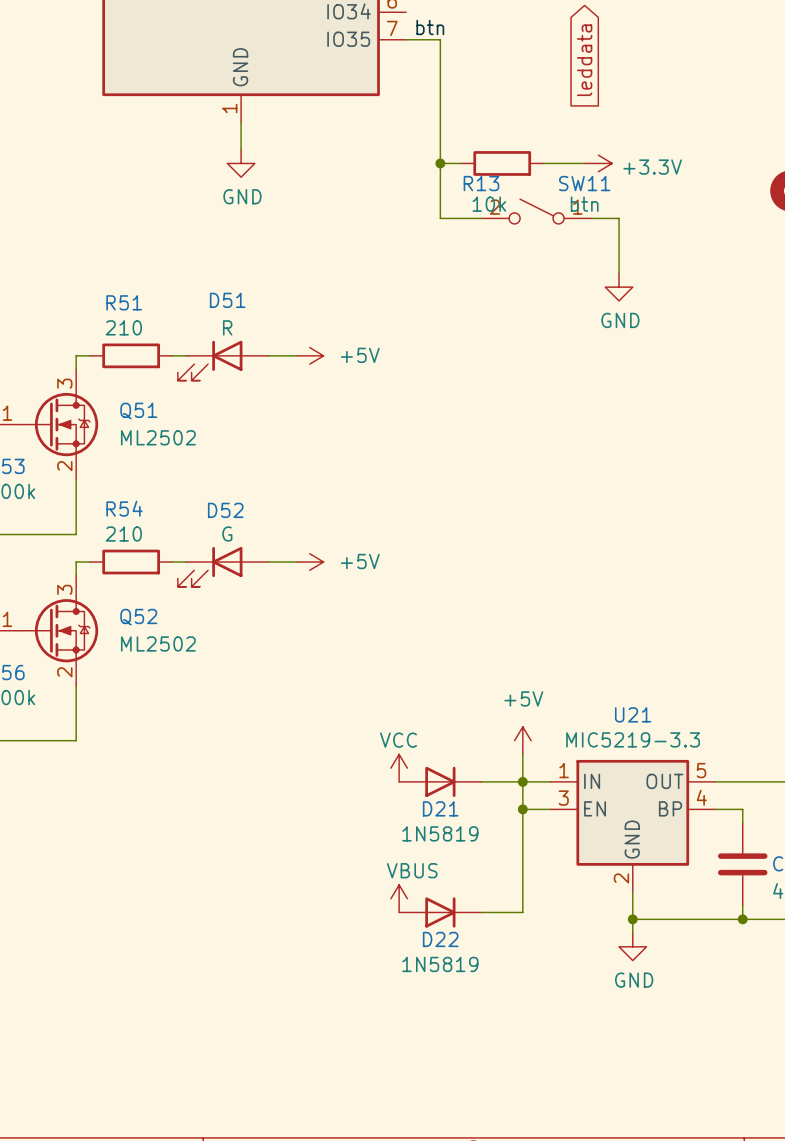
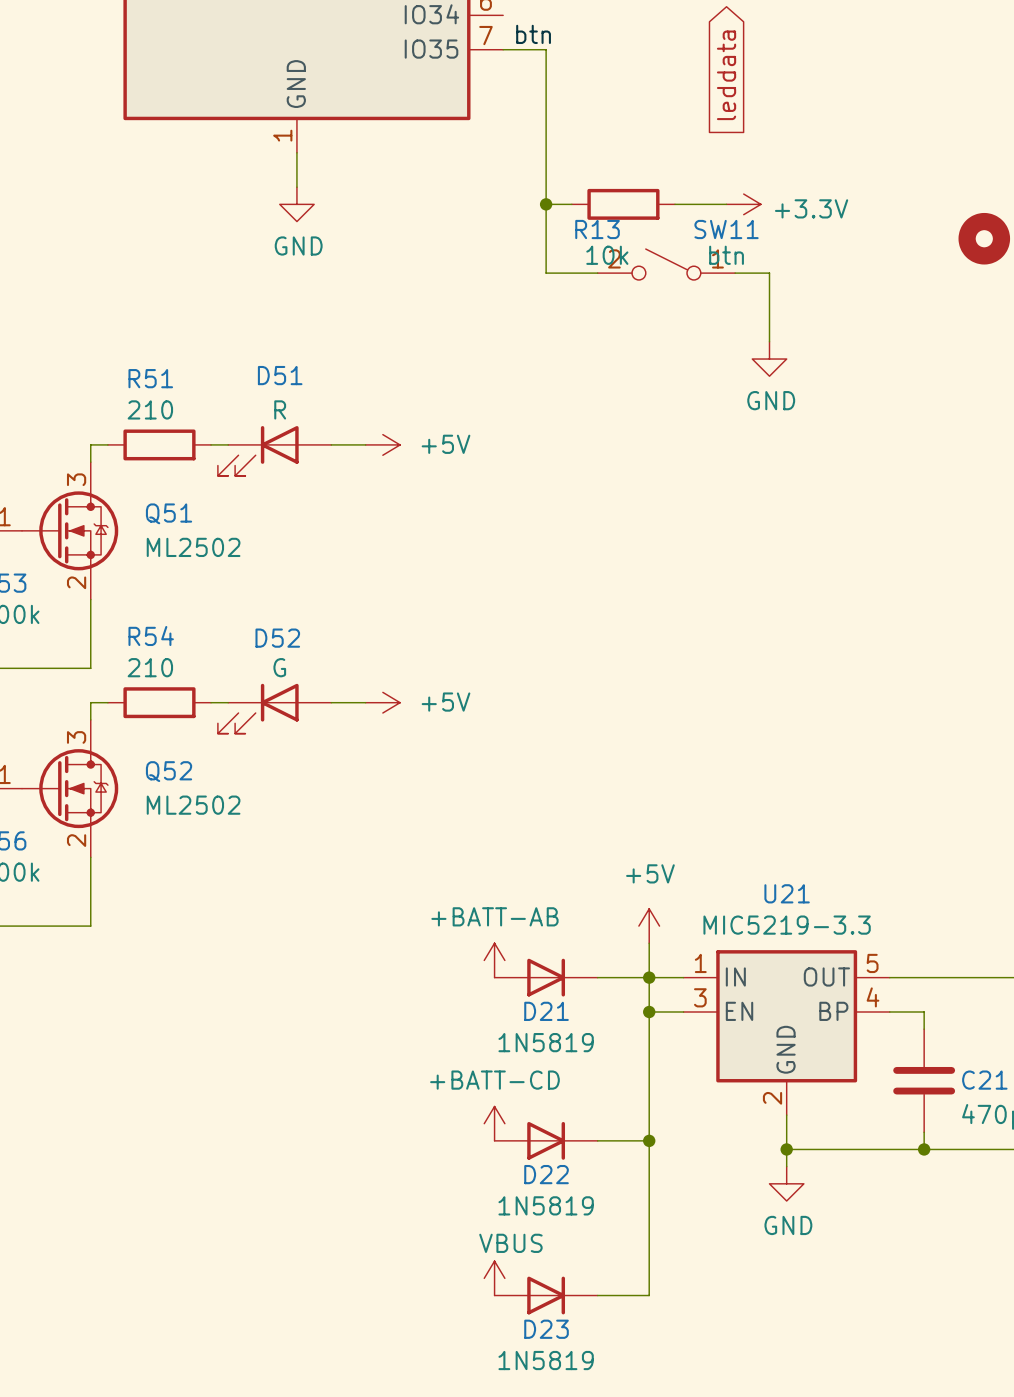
power symbol: VCC (399, 768) -> +BATT-AB (494, 960)
power symbol: VBUS (399, 898) -> +BATT-CD (494, 1123)
wire: none -> (649, 1140) (649, 1295) (597, 1295)
junction: none -> (649, 1140)
power symbol: none -> VBUS (494, 1278)
D23: none -> 1N5819 (546, 1295)

